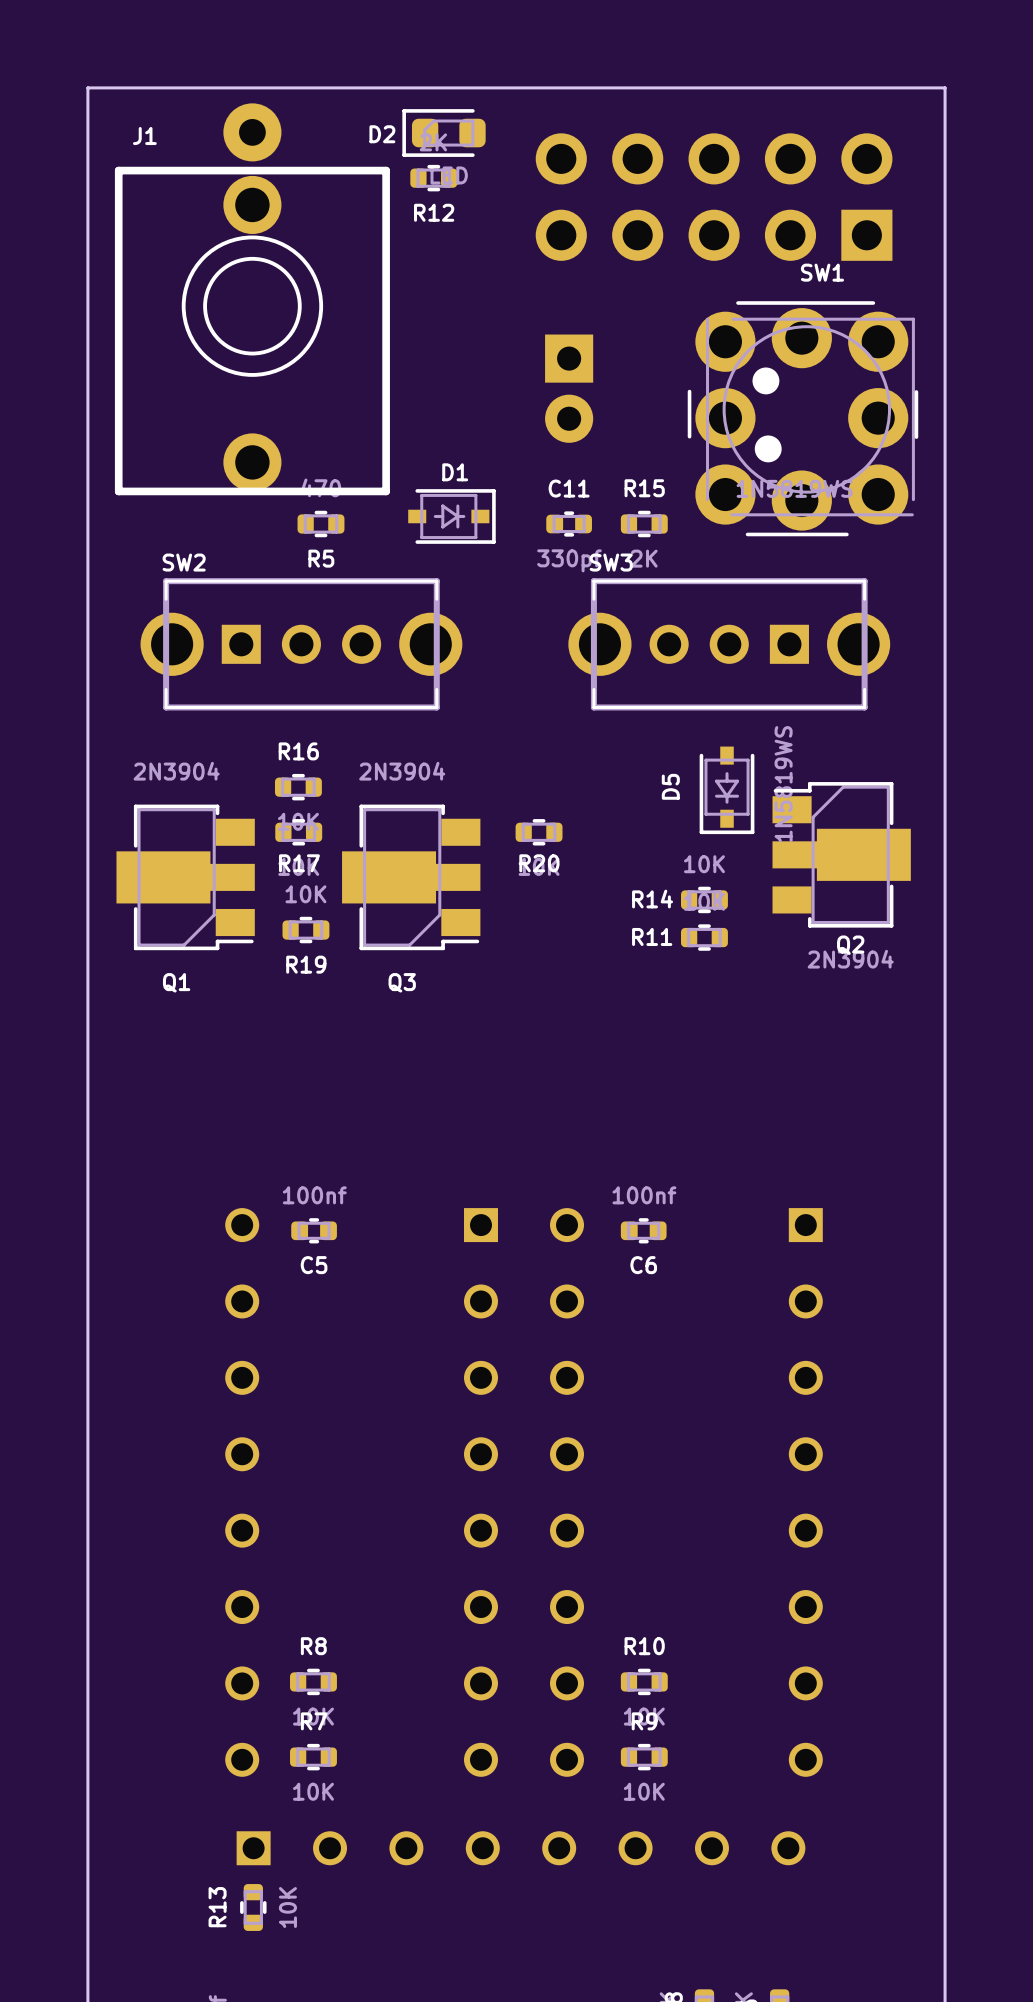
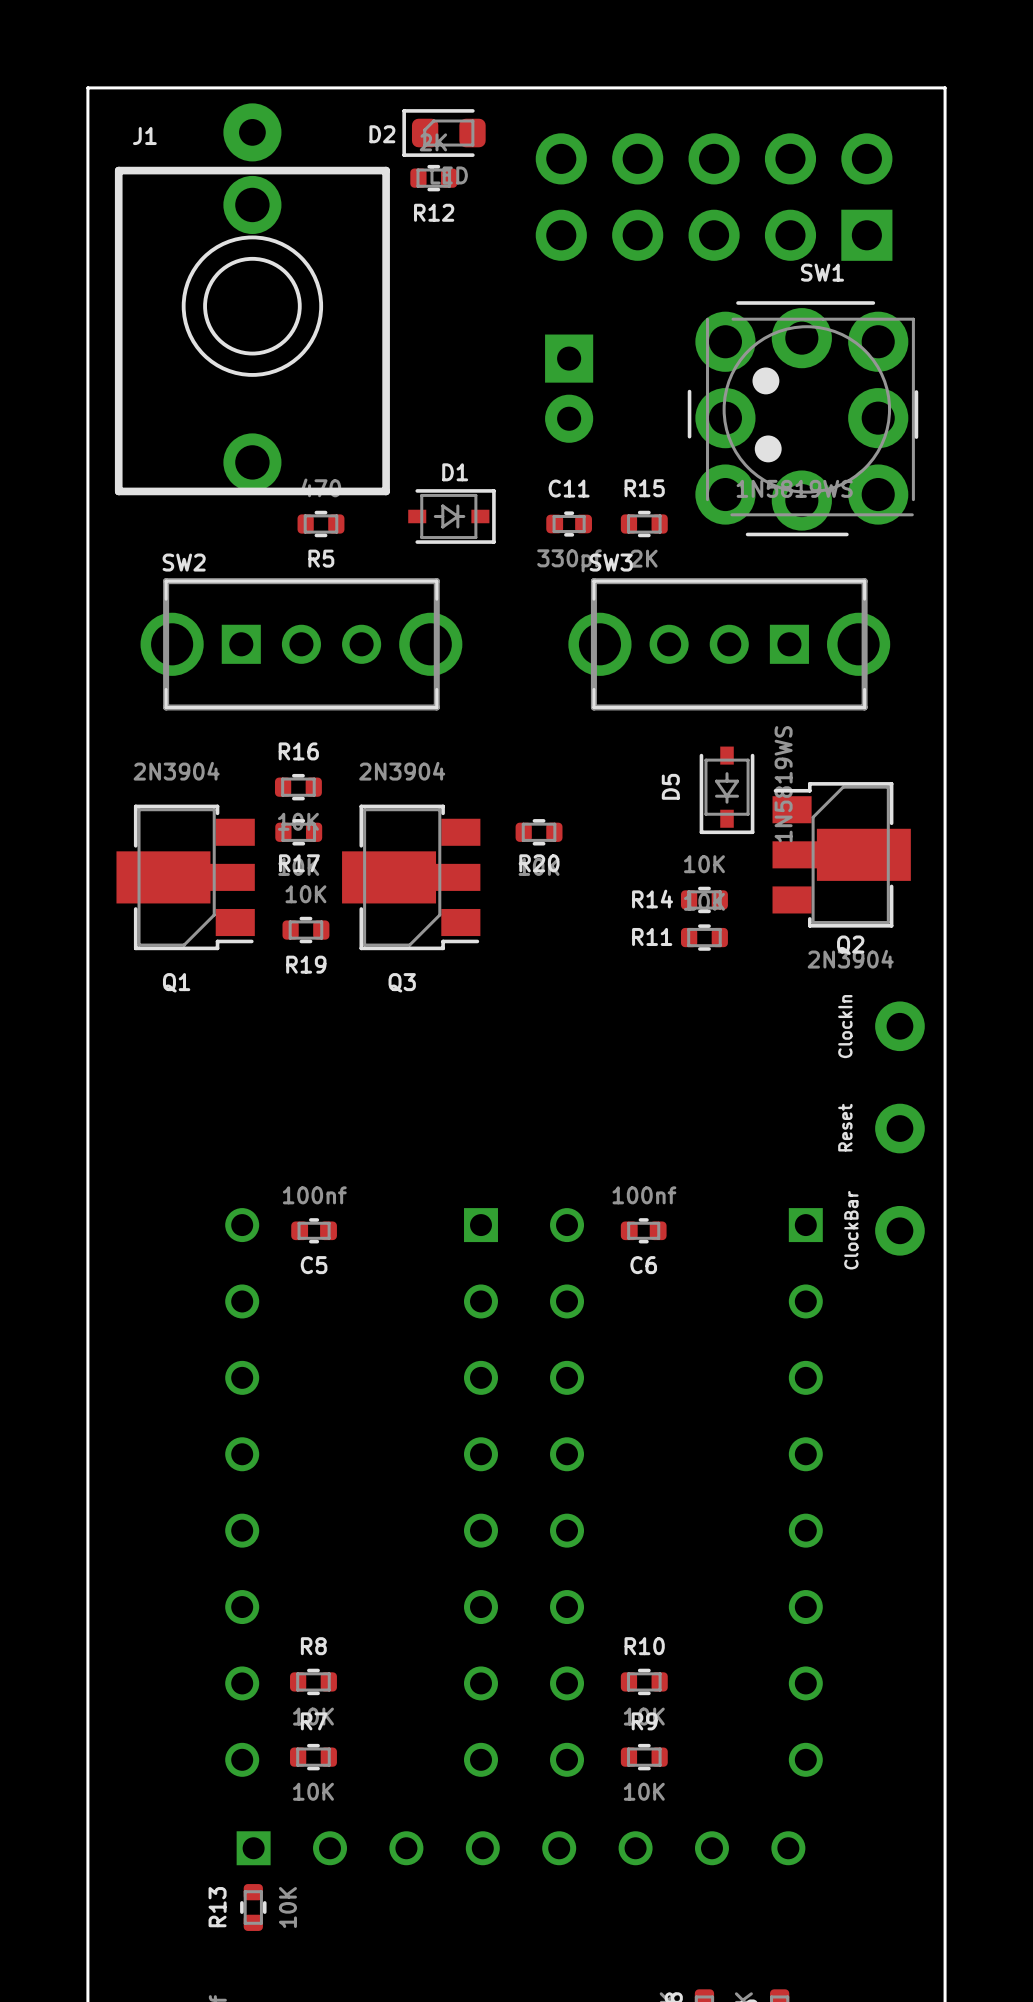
part: none -> ClockIn (899, 1026)
part: none -> Reset (899, 1128)
part: none -> ClockBar (899, 1230)

